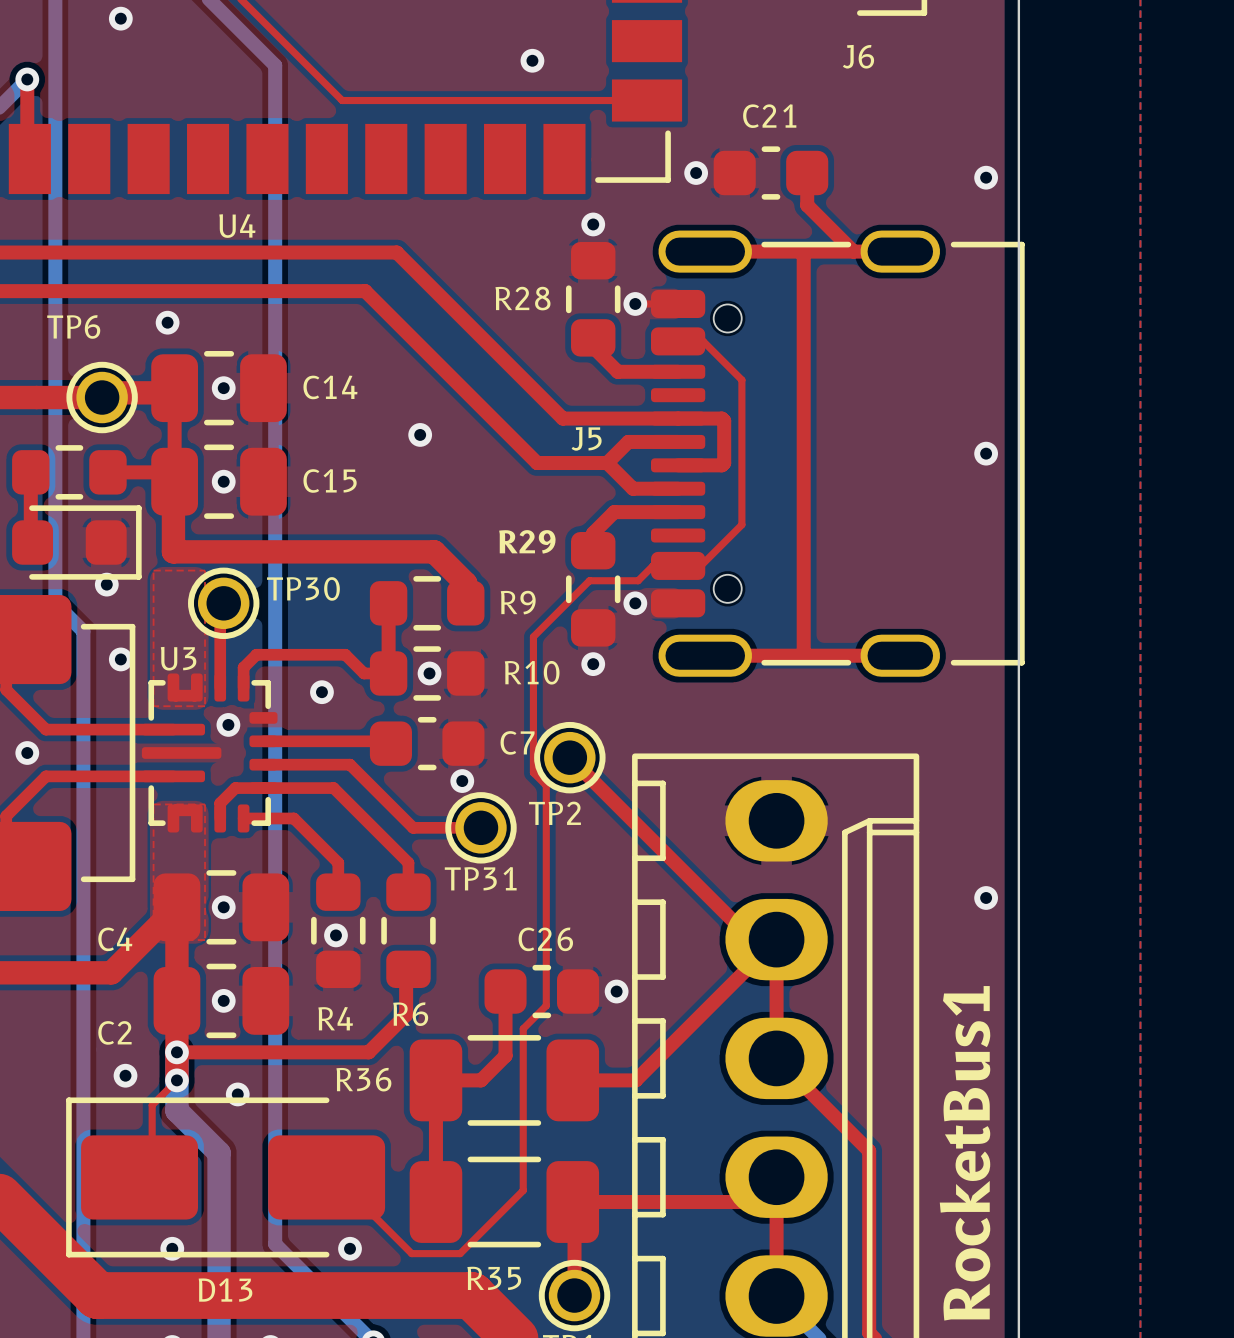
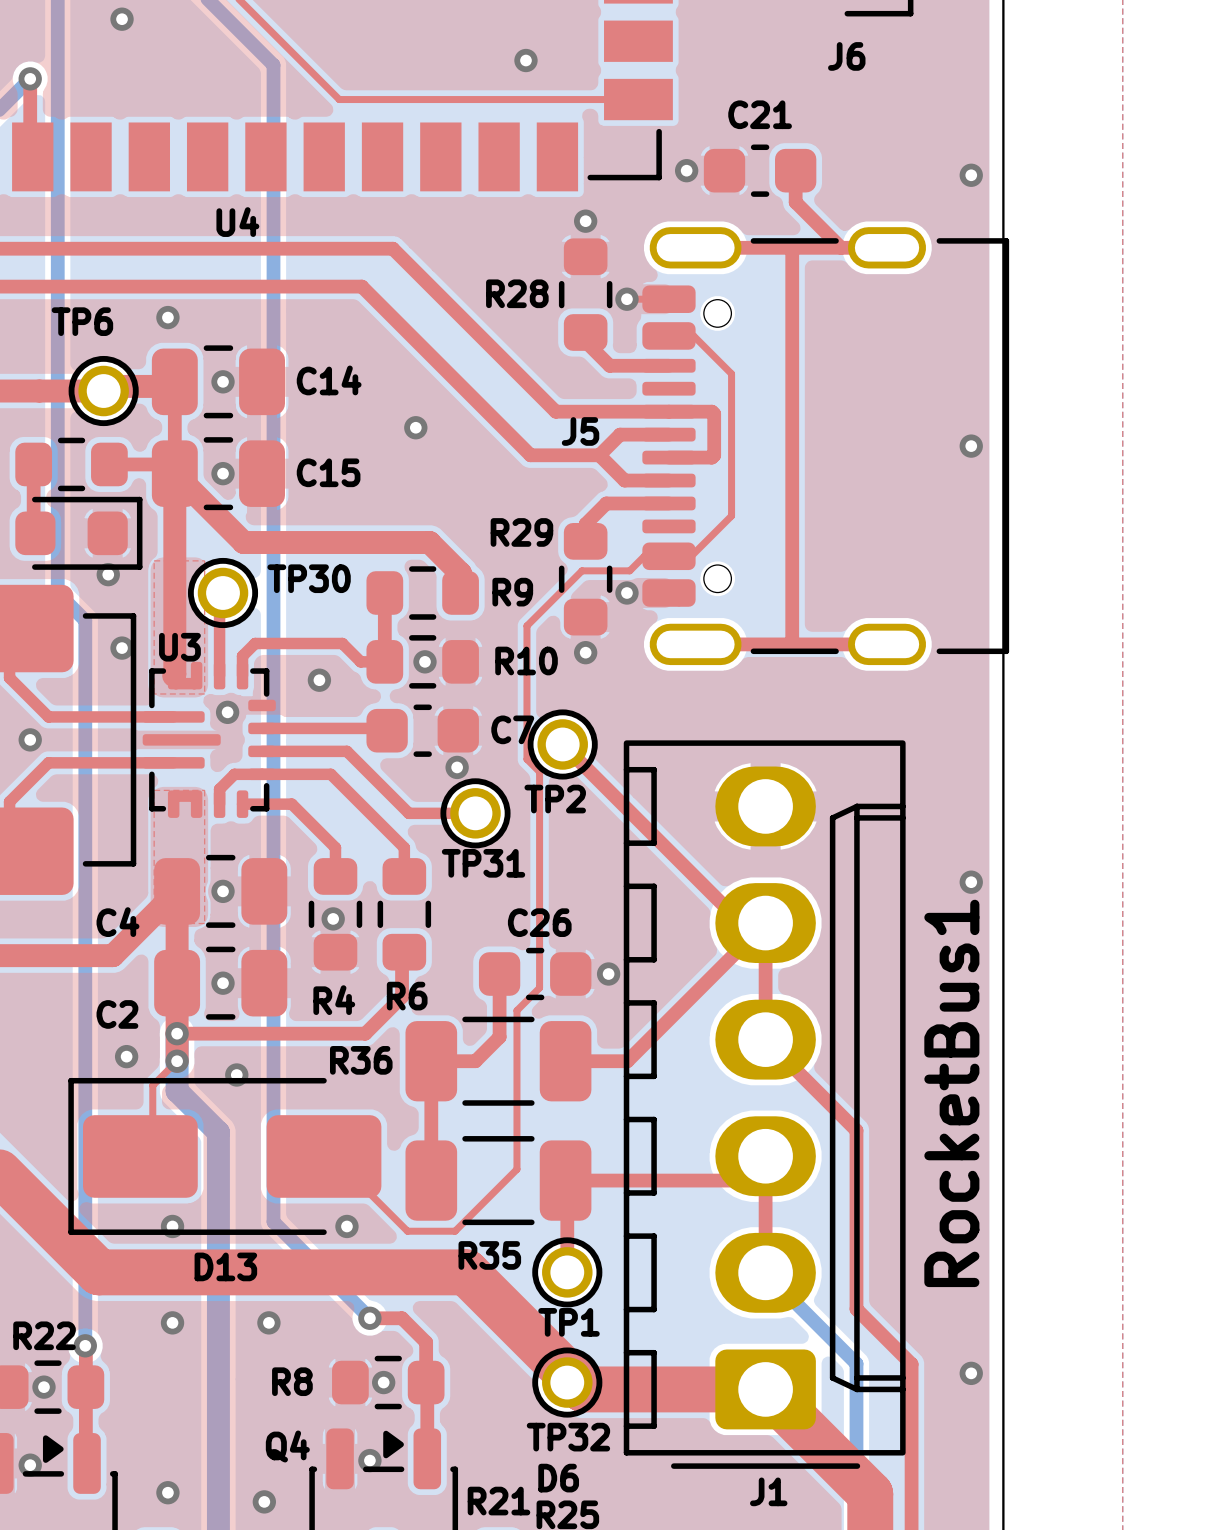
top track: (173, 482) (173, 551) (244, 551) -> (173, 675) (174, 473) (243, 542)

